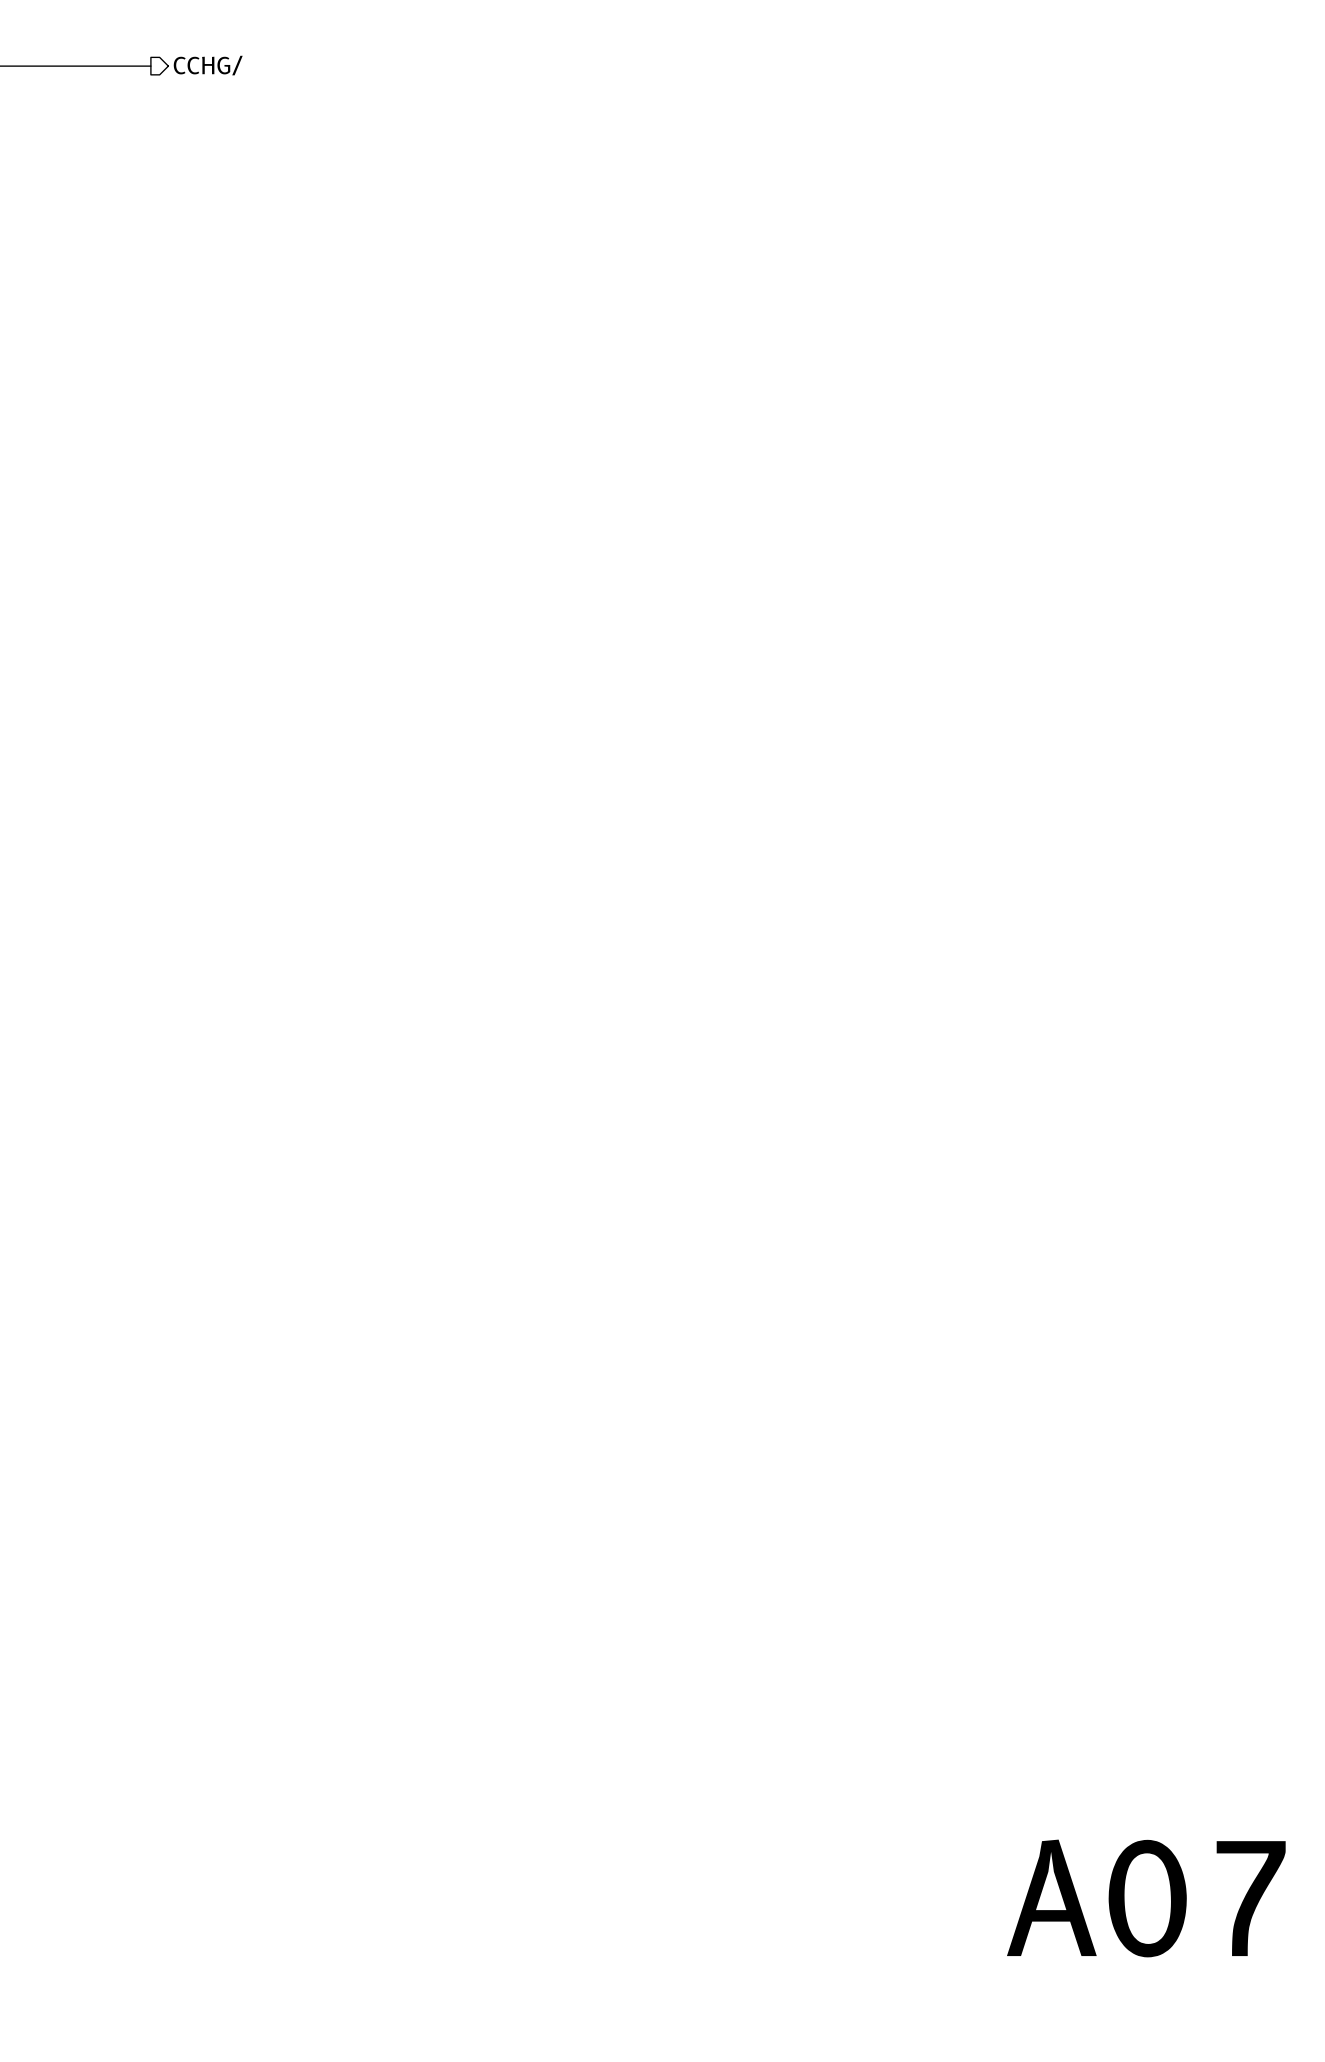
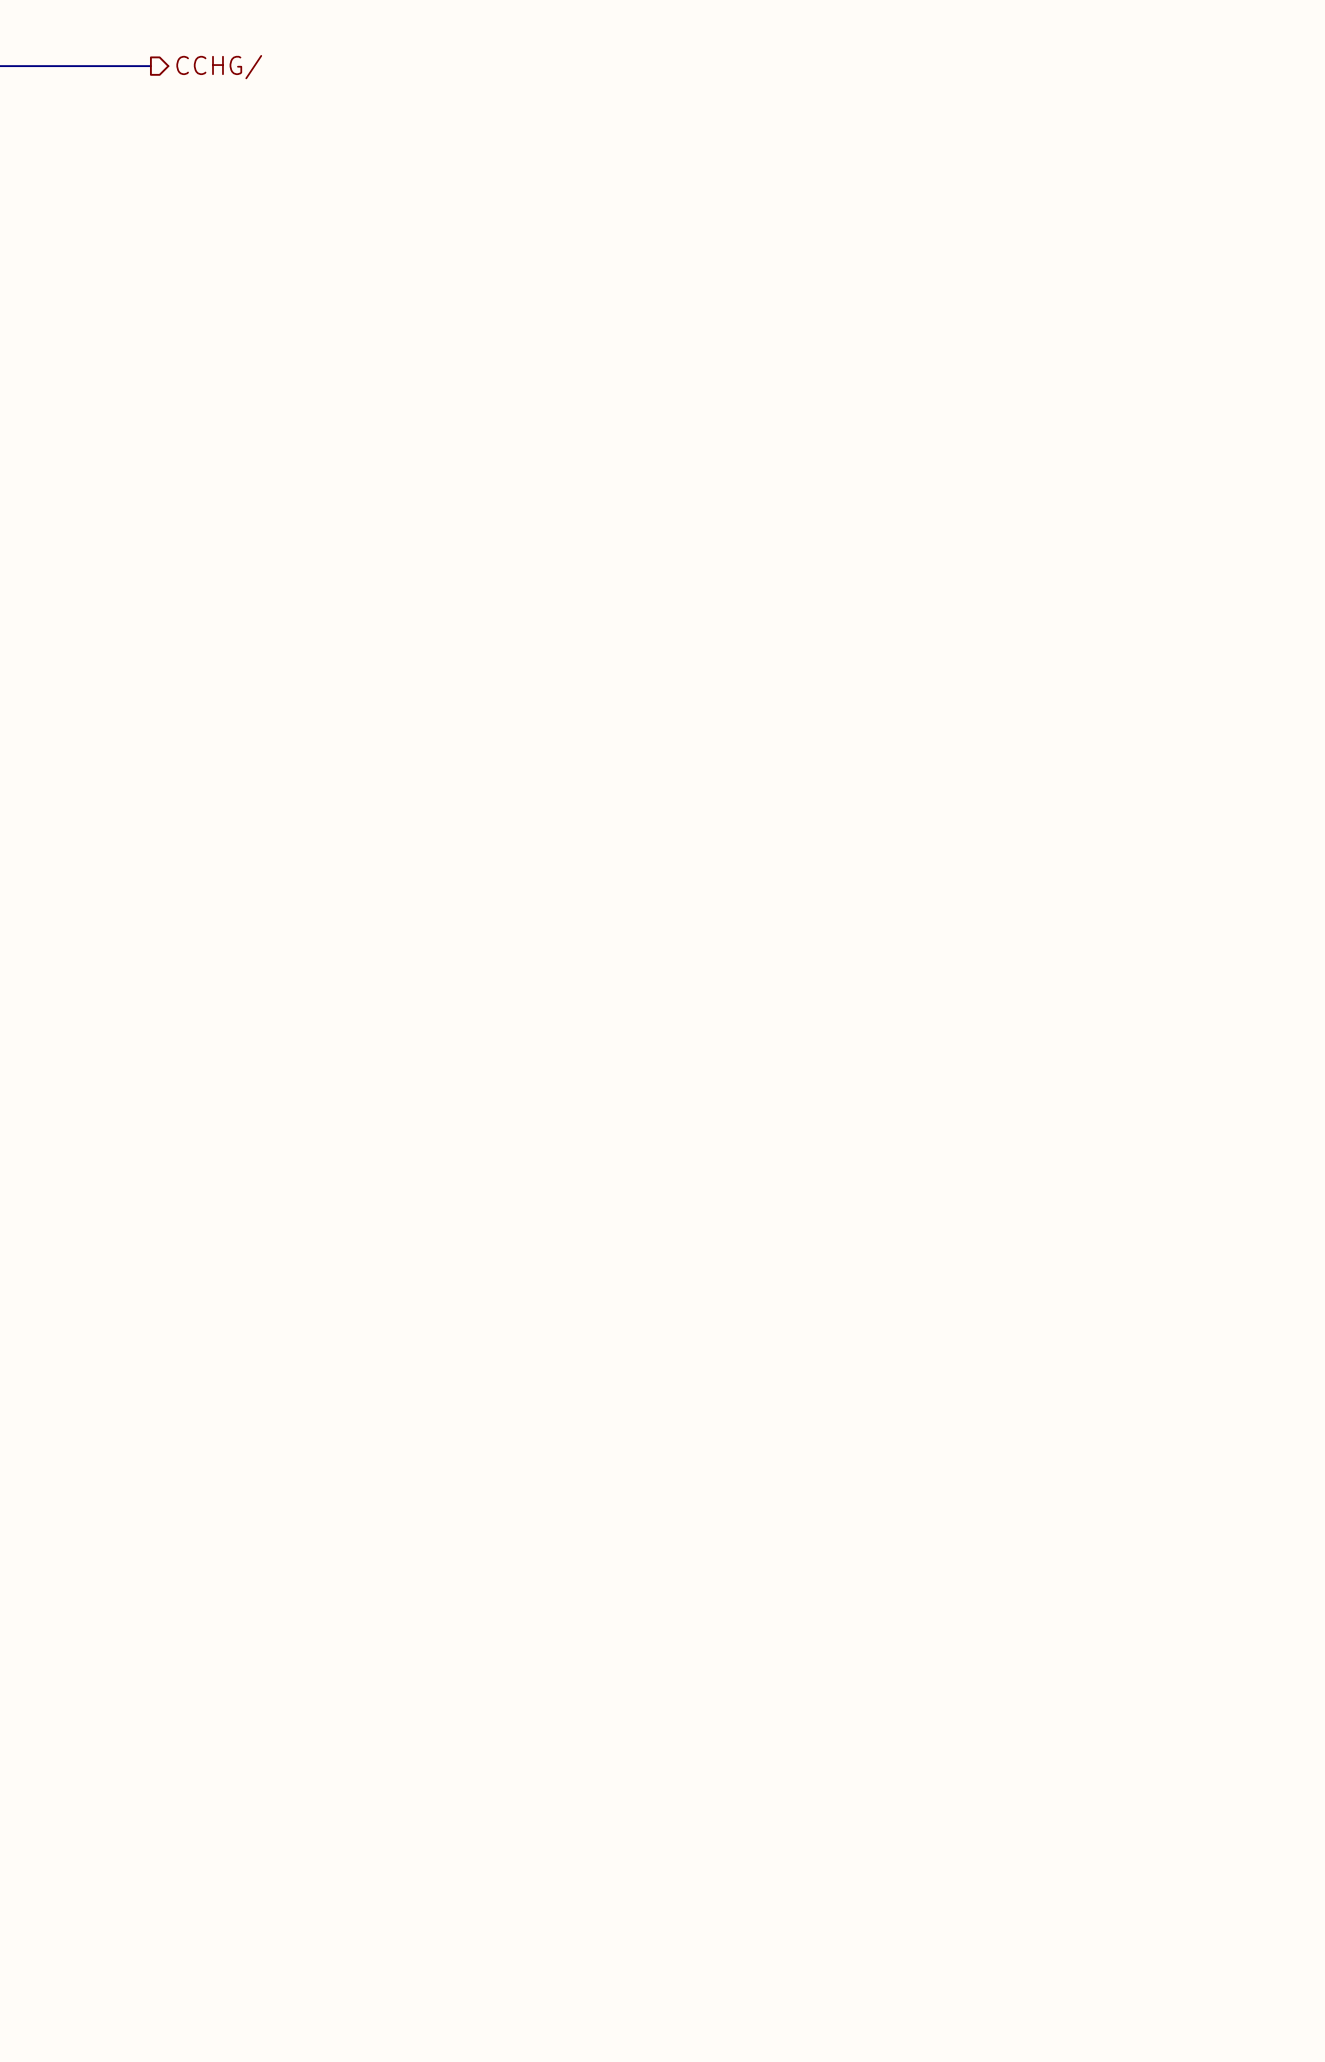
text: A07 (1146, 1898) -> none

